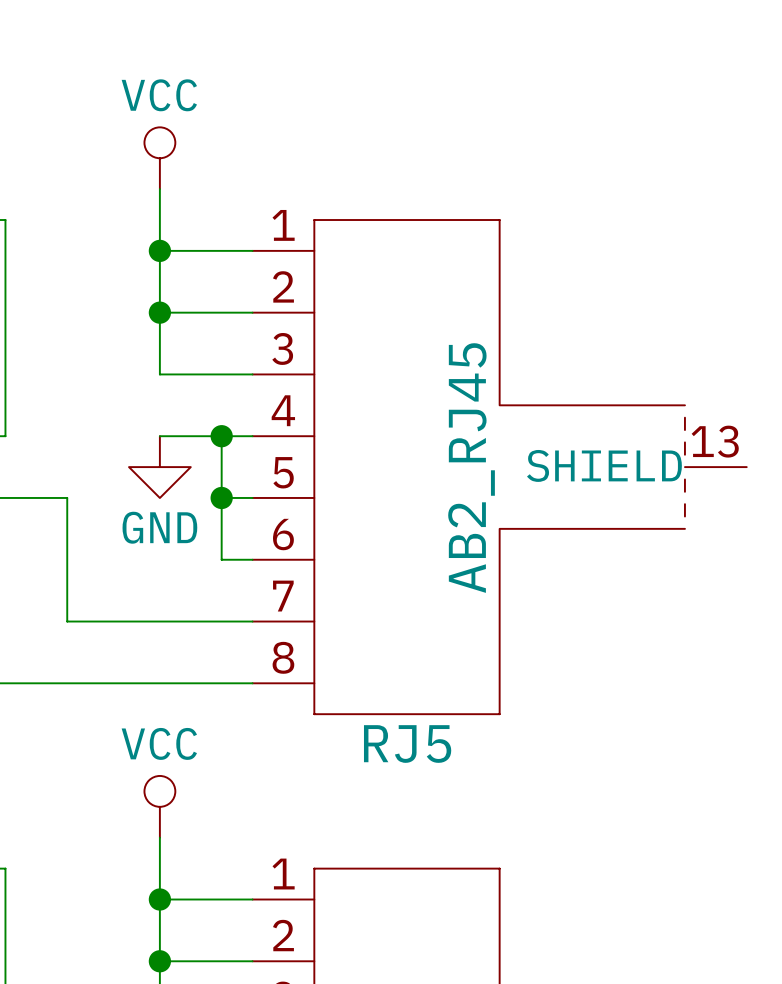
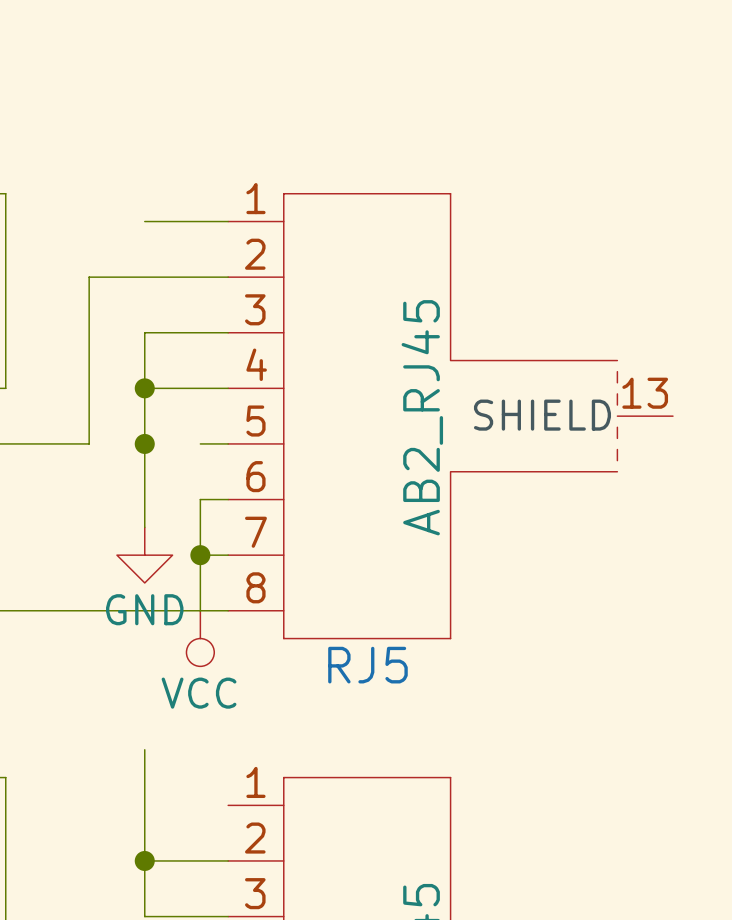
power symbol: VCC (159, 158) -> none
wire: (159, 189) (159, 374) -> (144, 527) (144, 332)
junction: (159, 250) -> none
junction: (159, 312) -> none
junction: none -> (144, 388)
wire: (221, 436) (221, 559) -> (200, 610) (200, 499)
junction: (221, 436) -> none
power symbol position: GND (159, 467) -> GND (144, 555)
wire: (67, 497) (67, 621) (221, 621) -> (61, 443) (89, 443) (89, 277) (144, 277)
junction: none -> (144, 443)
junction: (221, 497) -> none
junction: none -> (200, 555)
power symbol rotation: 0° (159, 806) -> 180° (200, 638)
power symbol position: VCC (159, 806) -> VCC (200, 638)
wire: (159, 899) (252, 899) -> none
junction: (159, 899) -> none

